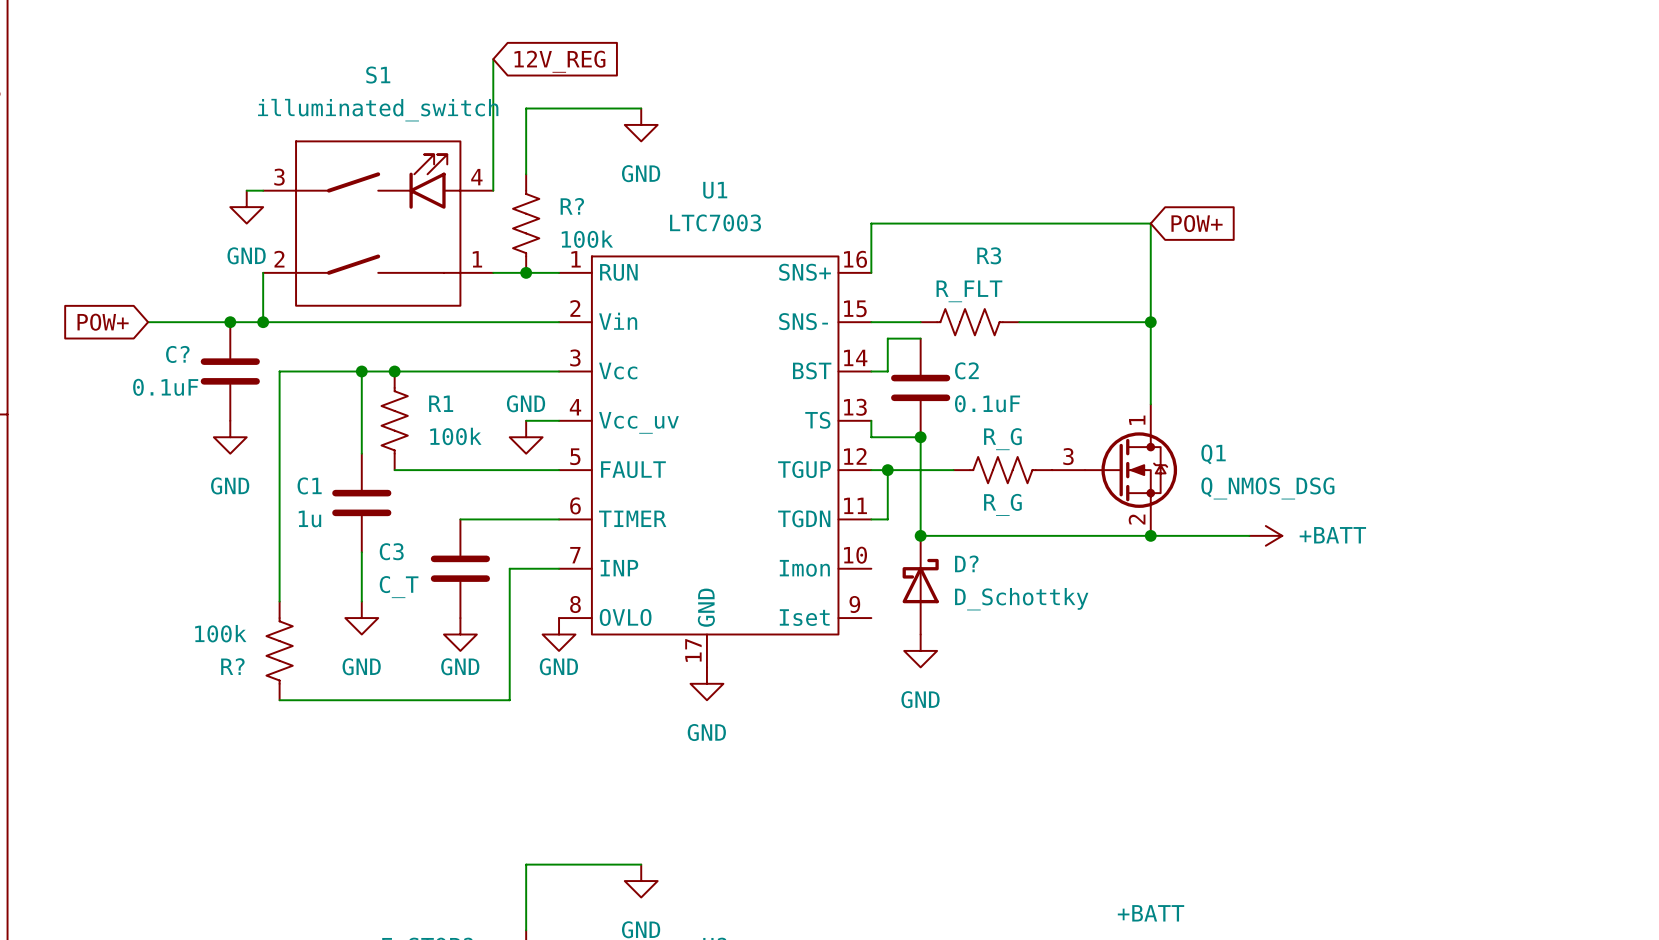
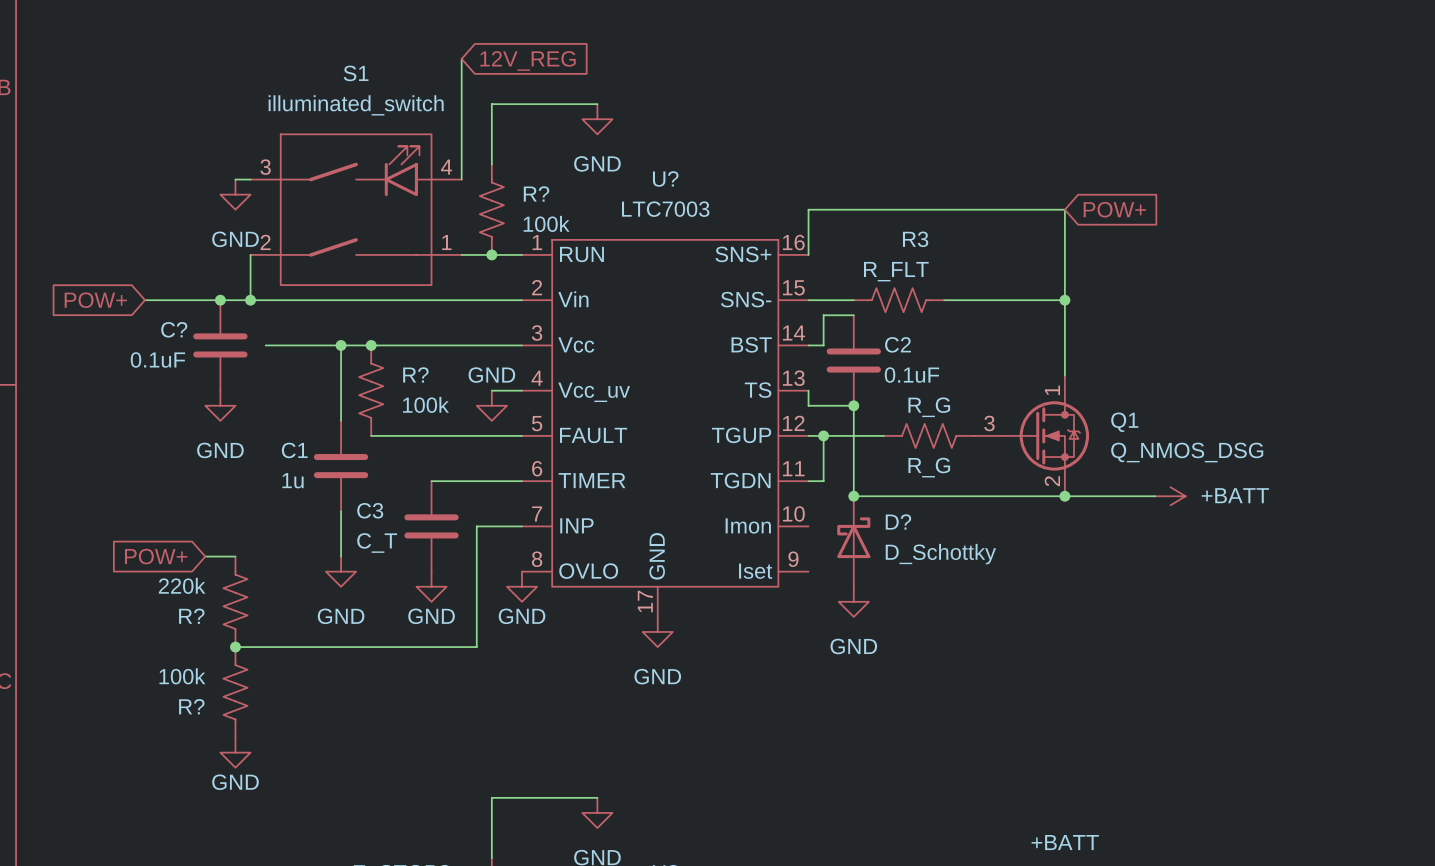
U1 name: U1 (715, 190) -> U? (665, 178)
wire: (279, 371) (279, 601) -> none
R1 name: R1 (441, 403) -> R? (415, 374)
global label: none -> POW+ (156, 556)
wire: none -> (205, 556) (235, 556)
R?: none -> 220k (235, 601)
R? position: (279, 650) -> (235, 692)
wire: none -> (235, 647) (265, 647)
junction: none -> (235, 647)
power symbol: none -> GND (235, 752)

